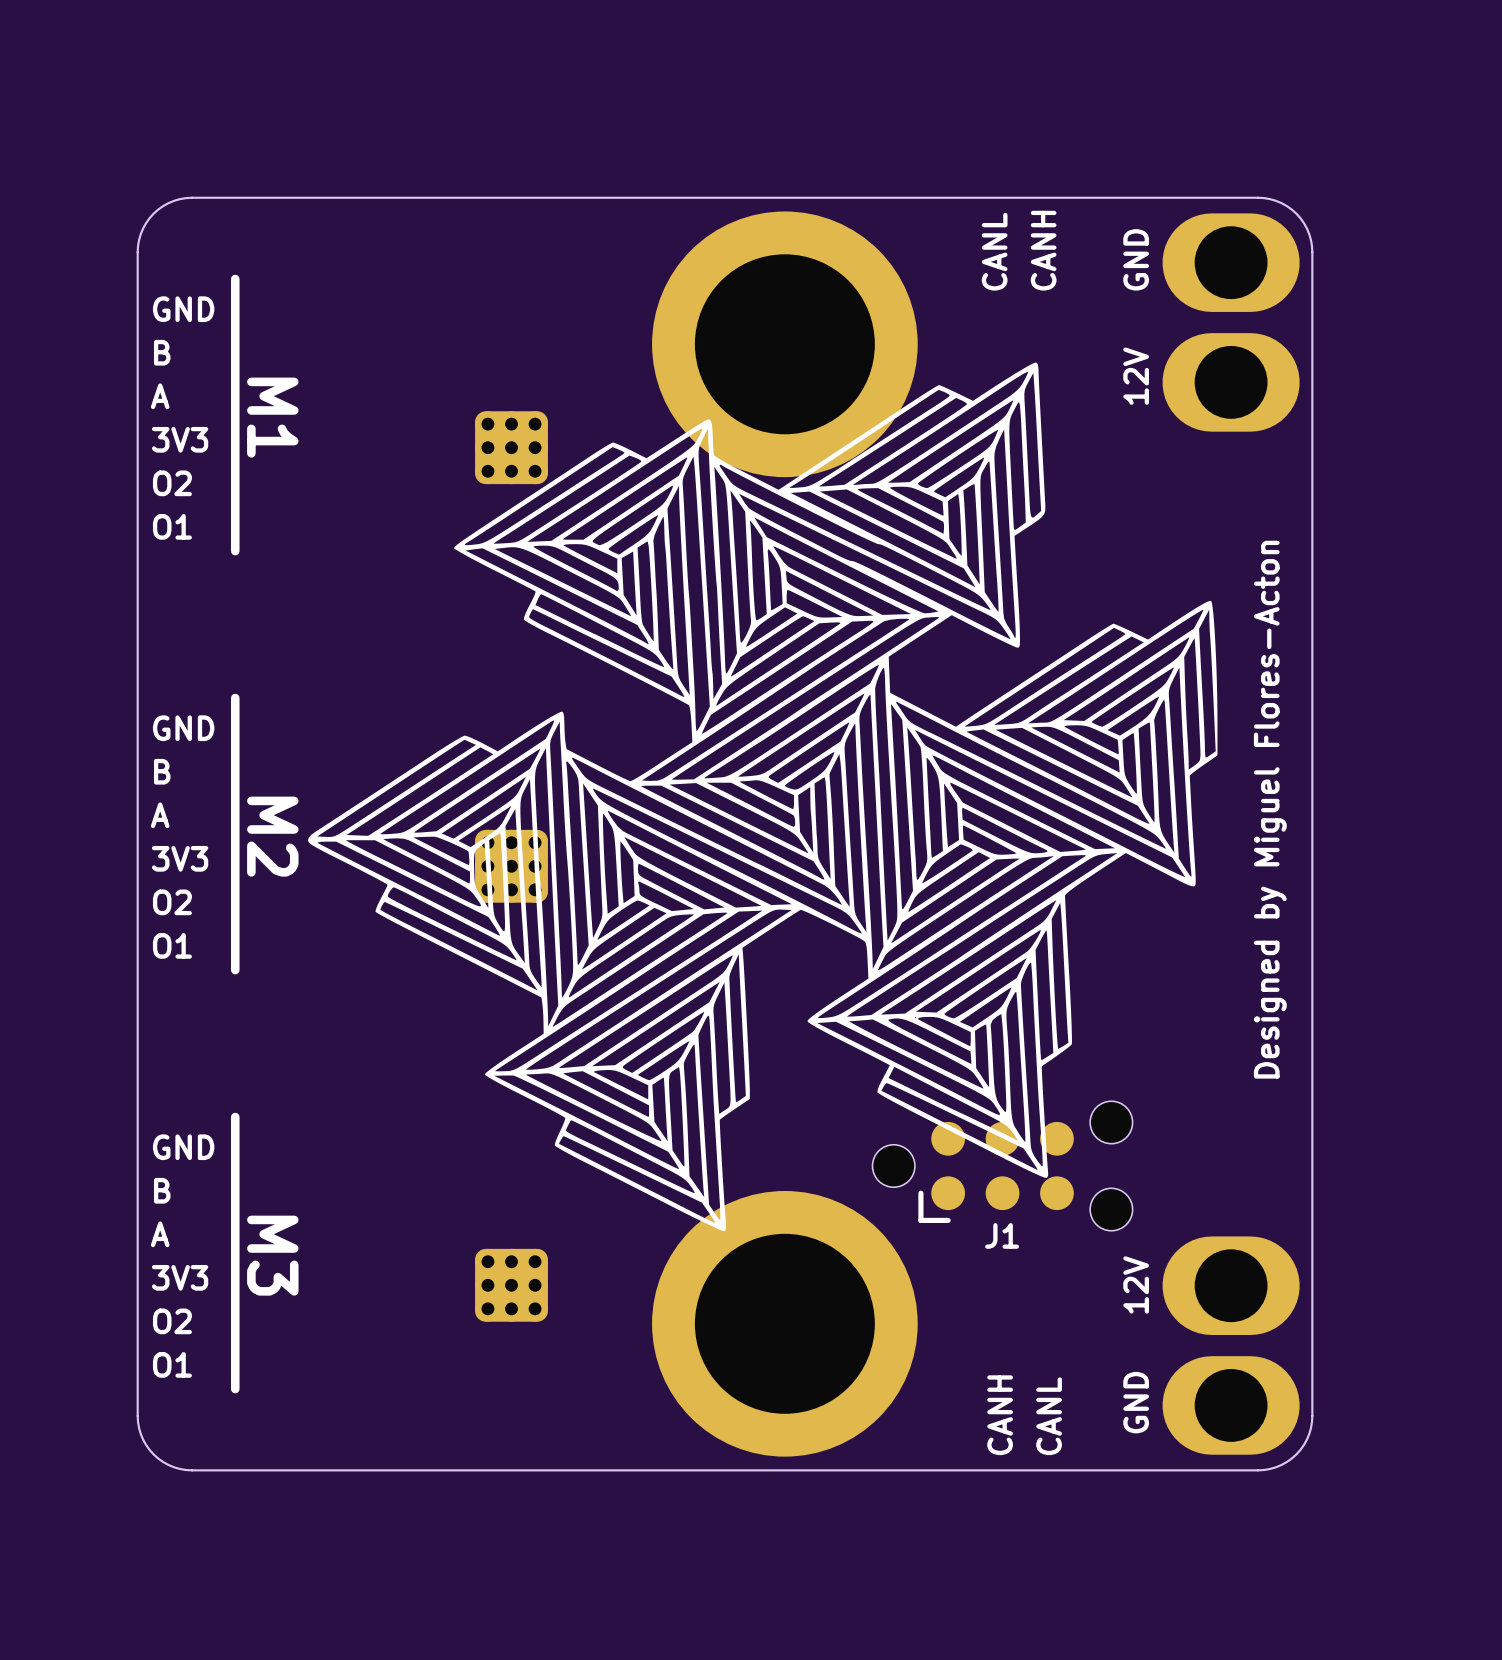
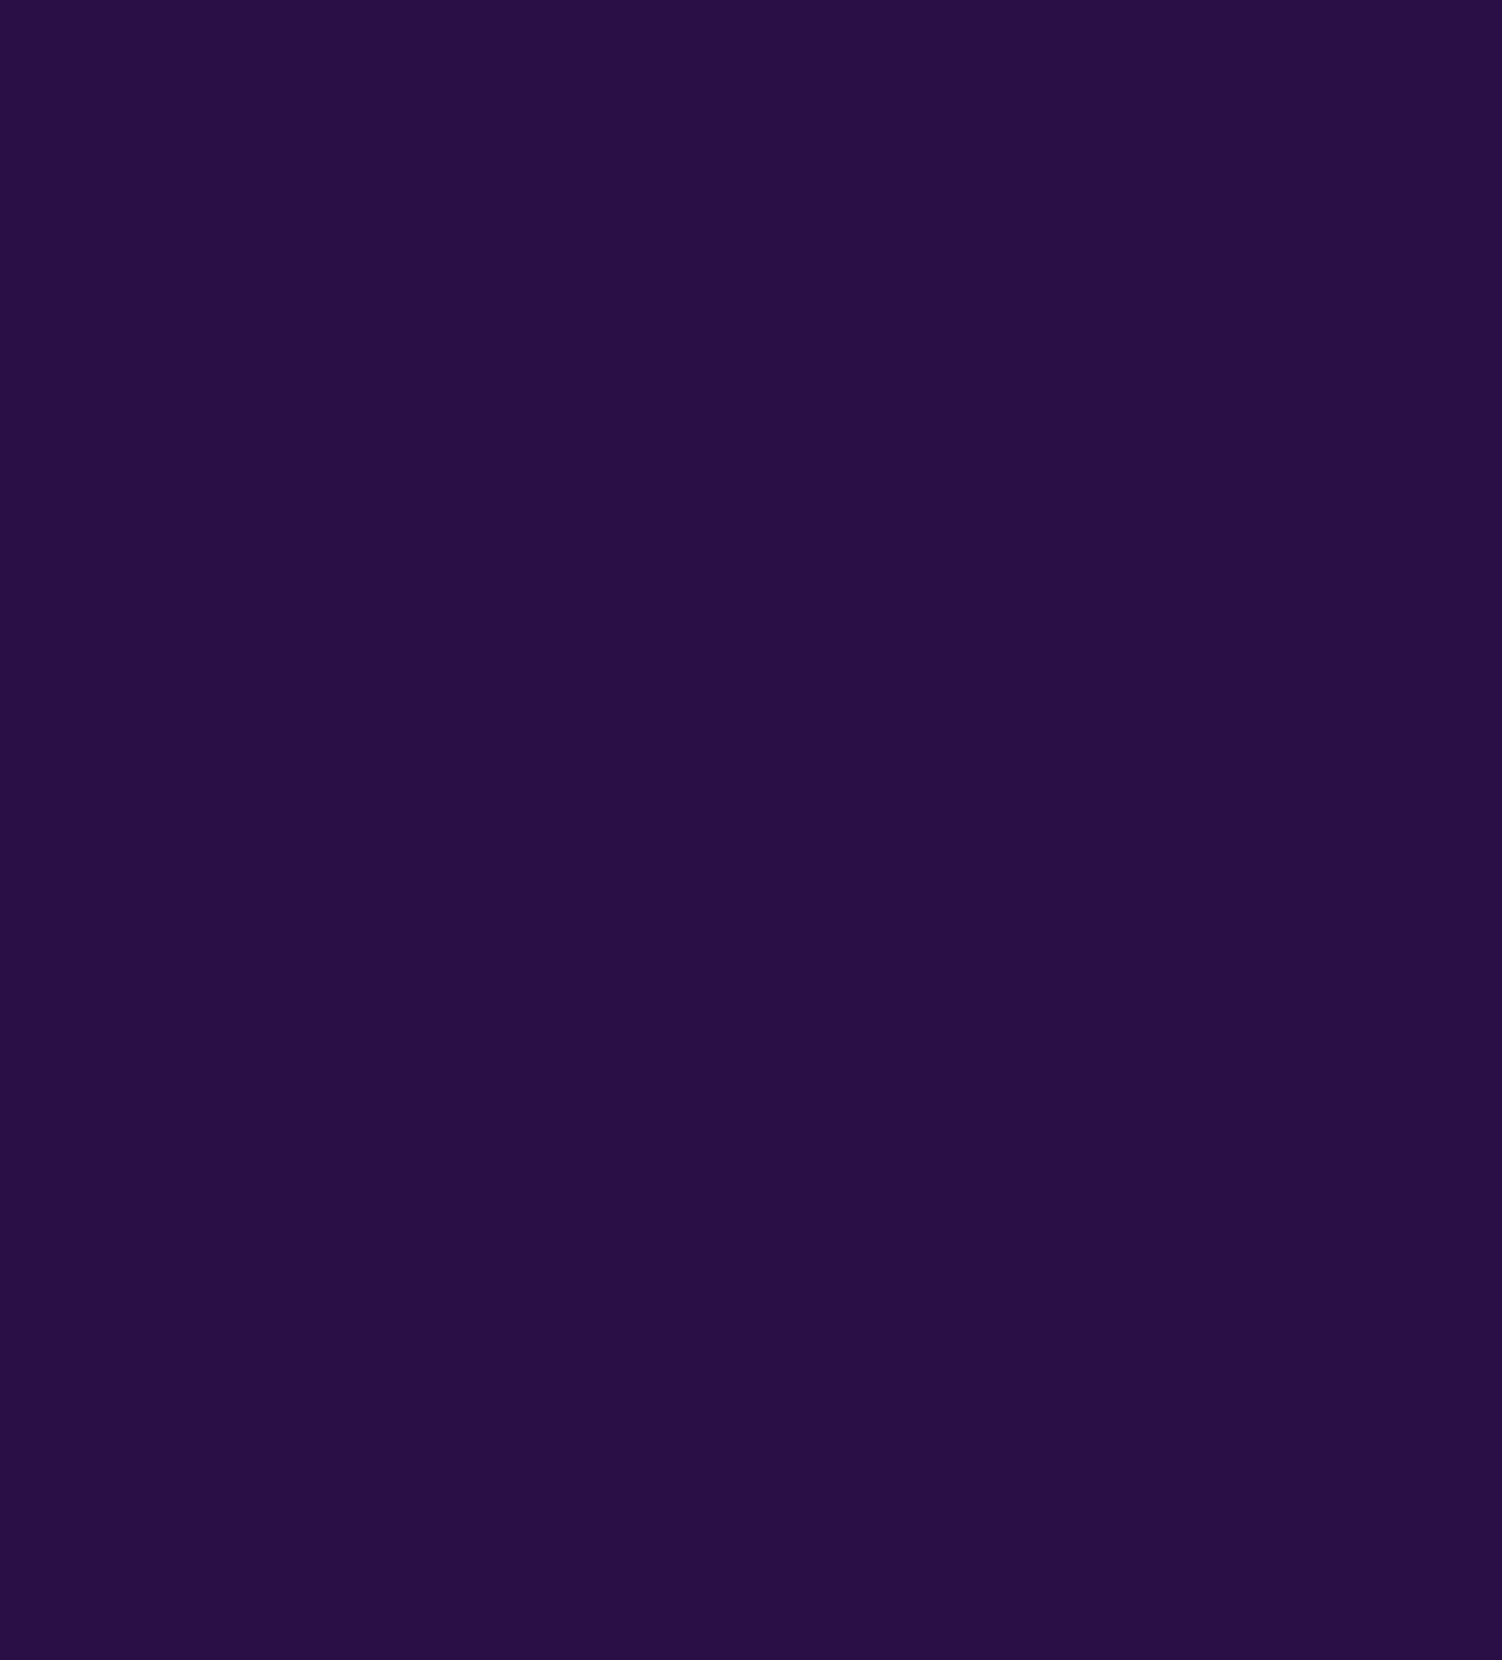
board edge: (1257, 197) (192, 197) (168, 203) (149, 218) (140, 234) (137, 252) (137, 1415) (143, 1439) (158, 1458) (174, 1467) (192, 1470) (1257, 1470) (1281, 1464) (1300, 1449) (1309, 1433) (1312, 1415) (1312, 252) (1306, 228) (1296, 213) (1281, 203) (1257, 197) -> none
text: CANH (1043, 250) -> none
text: CANL (994, 251) -> none
text: GND (1136, 259) -> none
line: (235, 278) (235, 551) -> none
text: GND (183, 309) -> none
part: (1231, 322) -> none
part: (784, 344) -> none
text: B (162, 352) -> none
drawing: [308, 362, 1218, 1232] -> none
text: 12V (1136, 376) -> none
text: A (160, 396) -> none
text: M1 (272, 417) -> none
text: 3V3 (180, 439) -> none
part: (511, 447) -> none
text: O2 (172, 483) -> none
text: O1 (172, 526) -> none
line: (235, 698) (235, 970) -> none
text: GND (183, 728) -> none
text: B (162, 771) -> none
text: Designed by Miguel Flores-Acton (1270, 809) -> none
text: A (160, 815) -> none
text: M2 (272, 836) -> none
text: 3V3 (180, 858) -> none
part: (511, 866) -> none
text: O2 (172, 902) -> none
text: O1 (172, 945) -> none
line: (235, 1117) (235, 1389) -> none
text: GND (183, 1147) -> none
J1: (1002, 1166) -> none
text: B (162, 1190) -> none
text: A (160, 1234) -> none
text: M3 (272, 1255) -> none
text: 3V3 (180, 1277) -> none
text: 12V (1136, 1284) -> none
part: (511, 1285) -> none
text: O2 (172, 1321) -> none
part: (784, 1323) -> none
part: (1231, 1345) -> none
text: O1 (172, 1364) -> none
text: GND (1136, 1402) -> none
text: CANH (1000, 1415) -> none
text: CANL (1049, 1416) -> none

